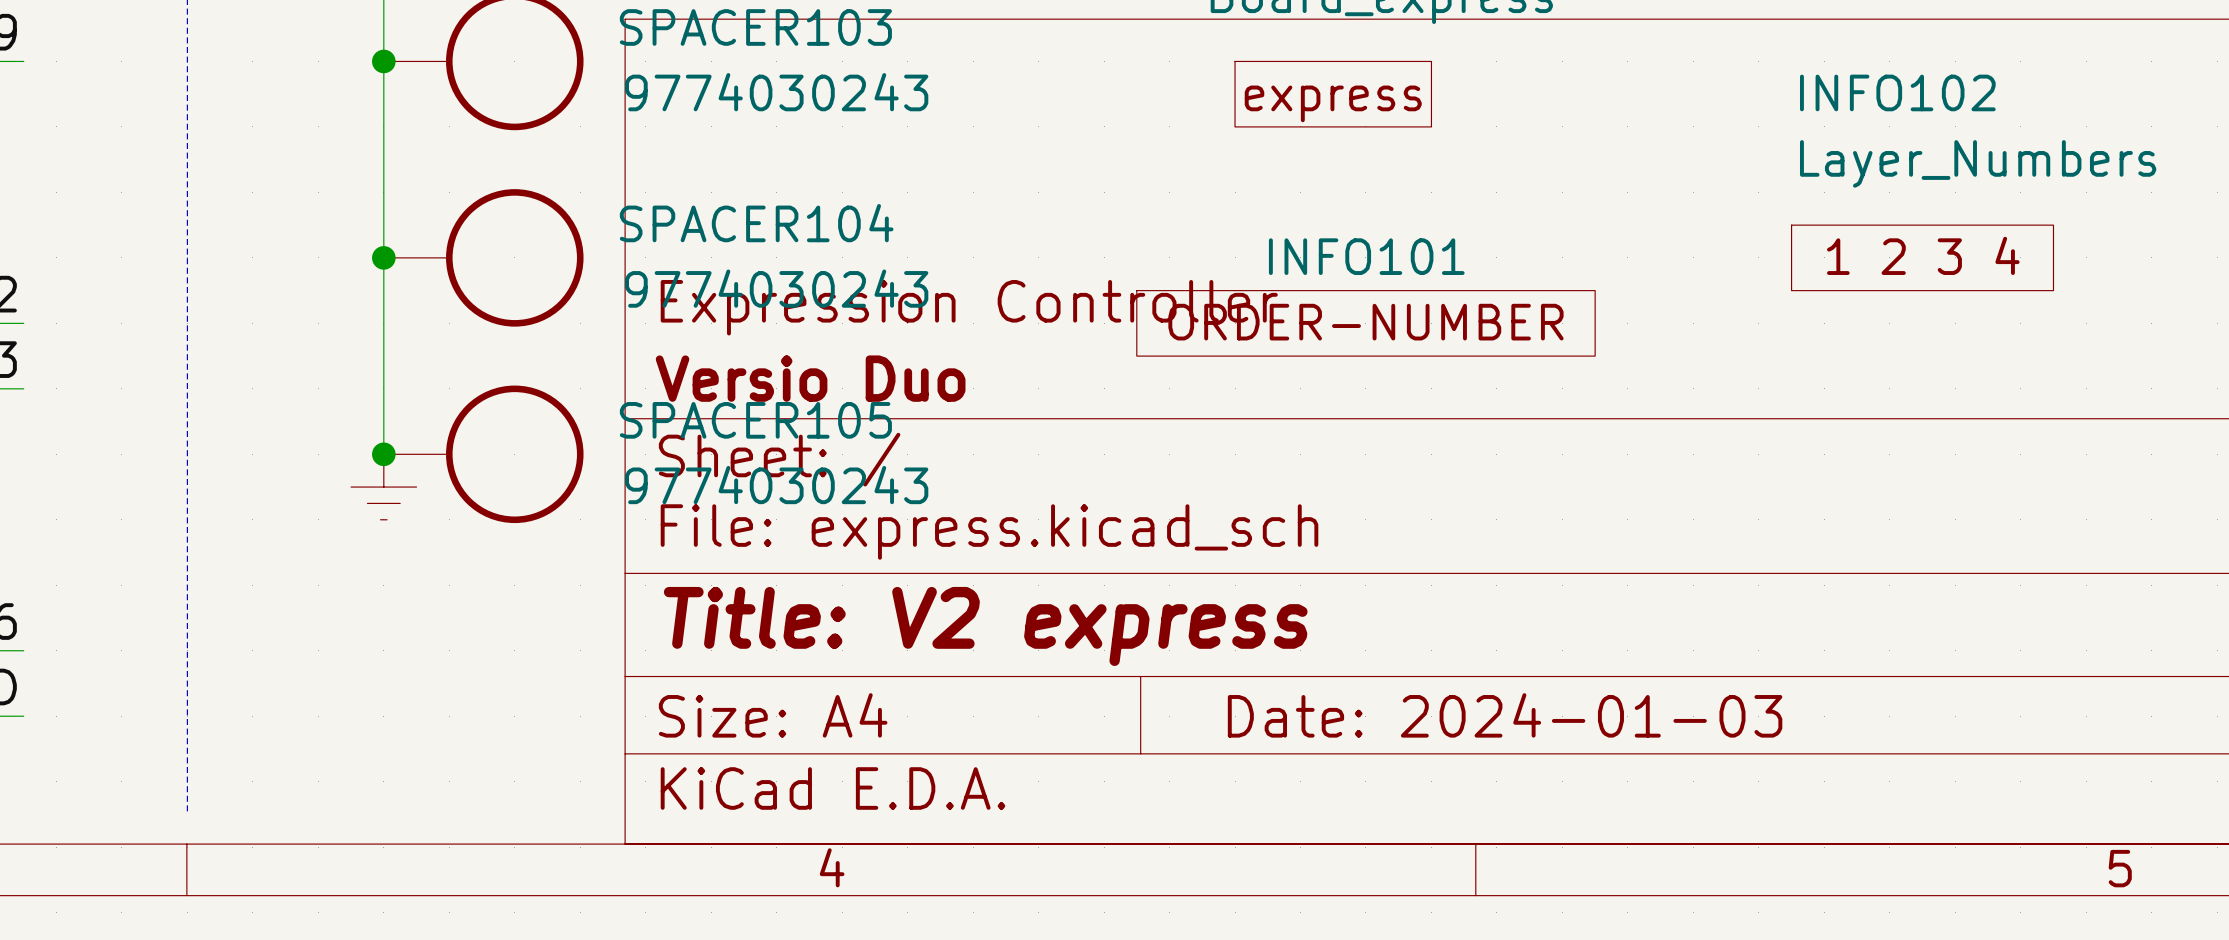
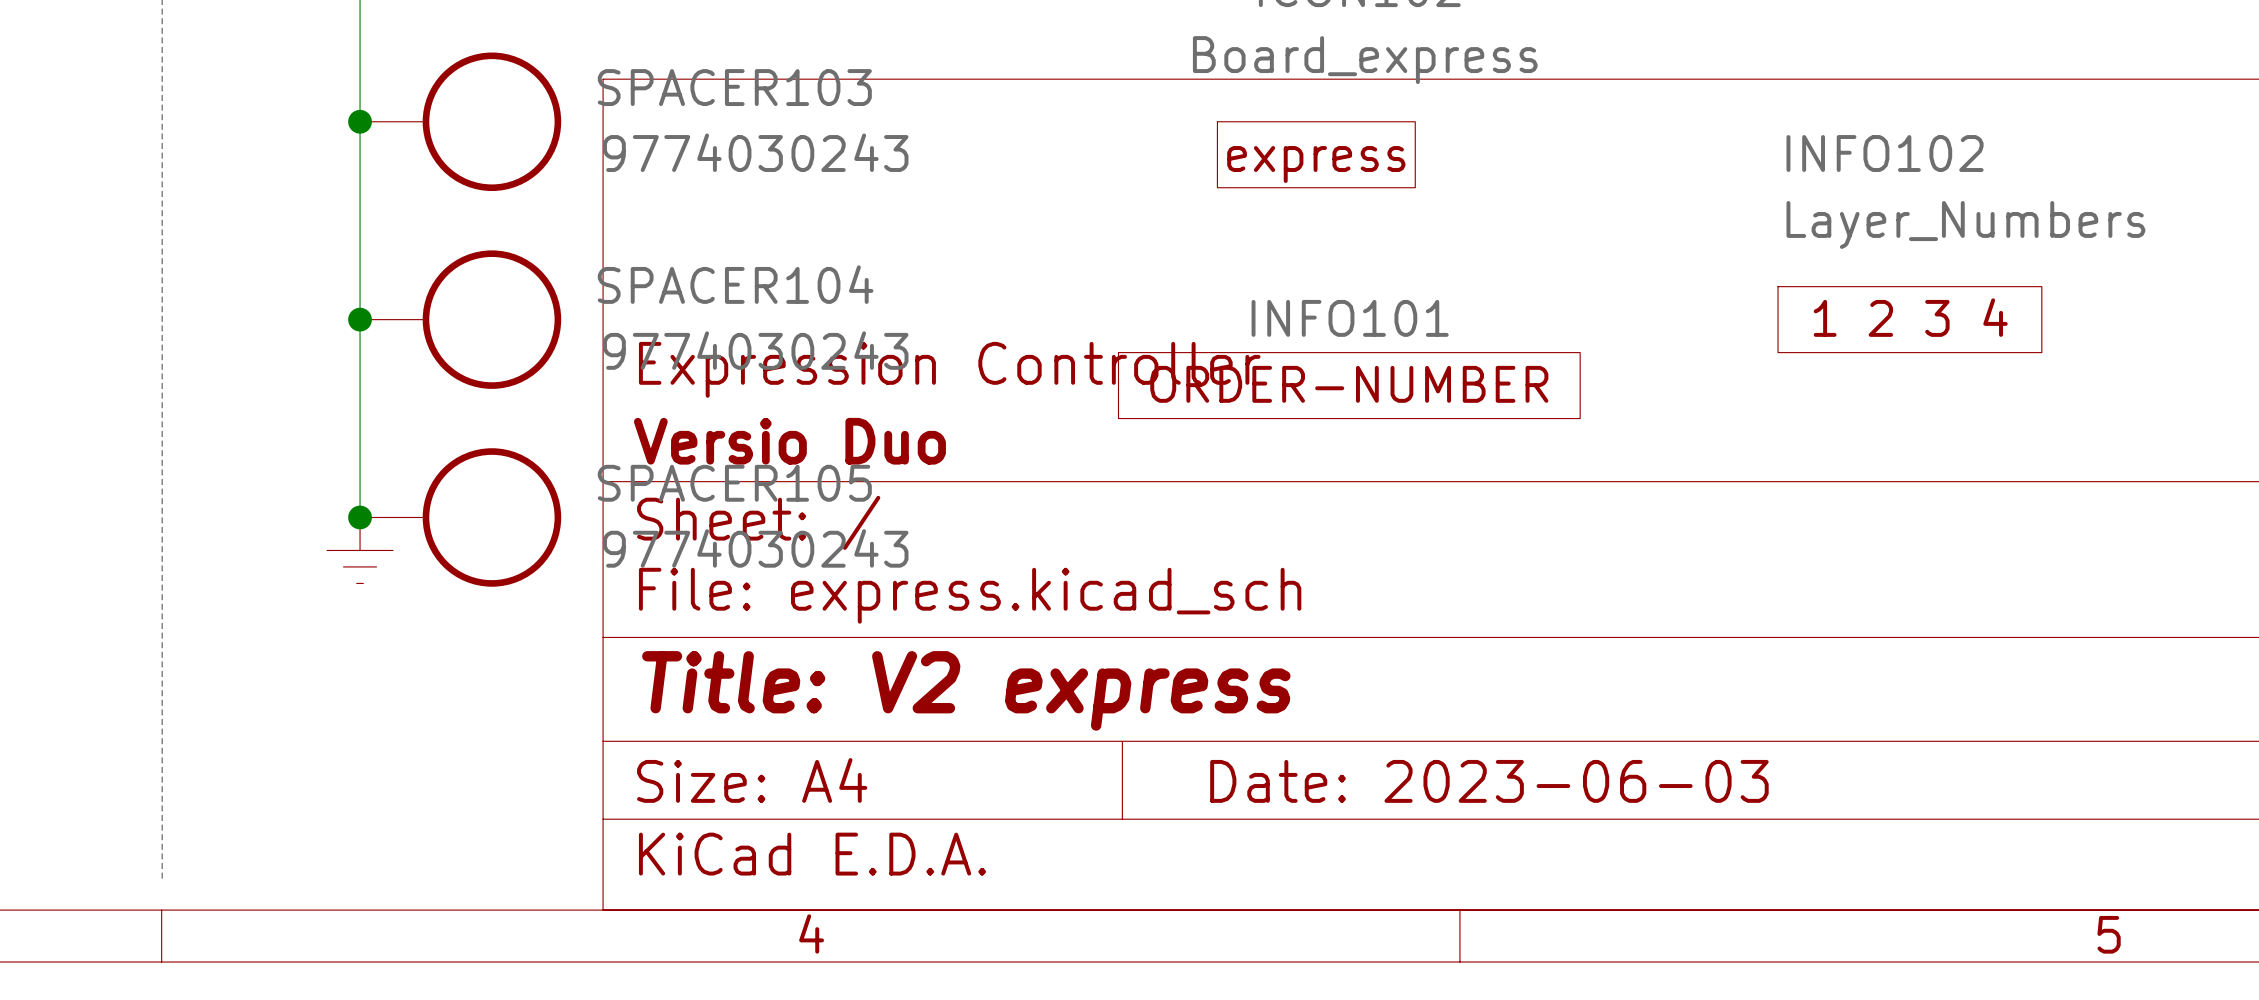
title block: Date: 2024-01-03 (1505, 715) -> Date: 2023-06-03 (1489, 781)

